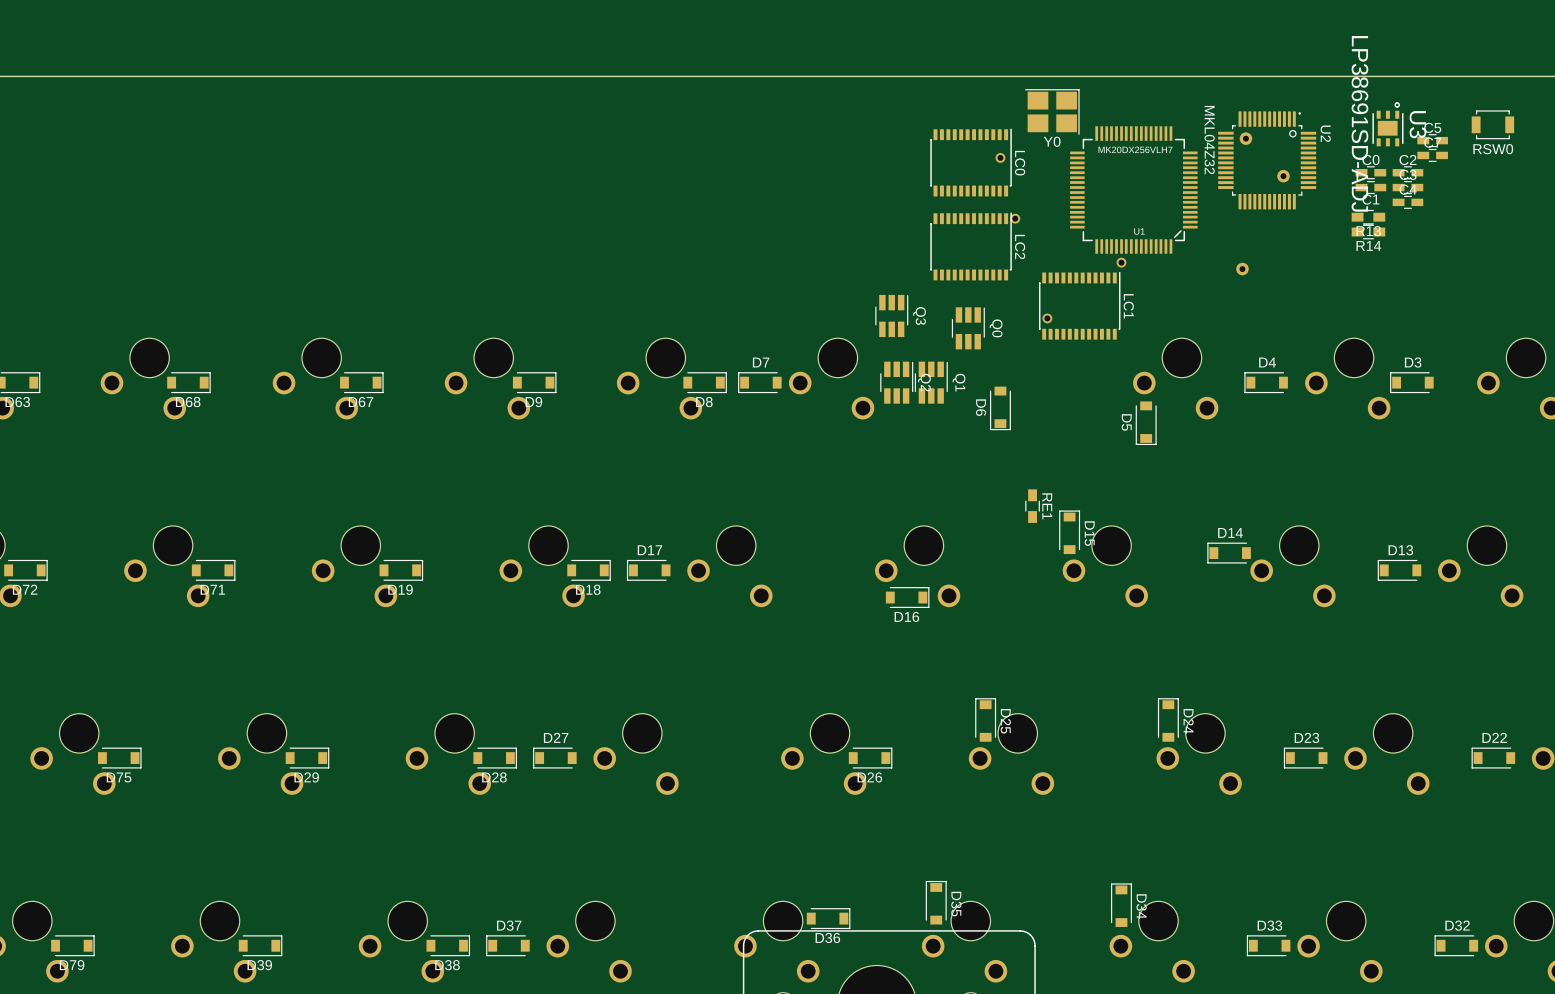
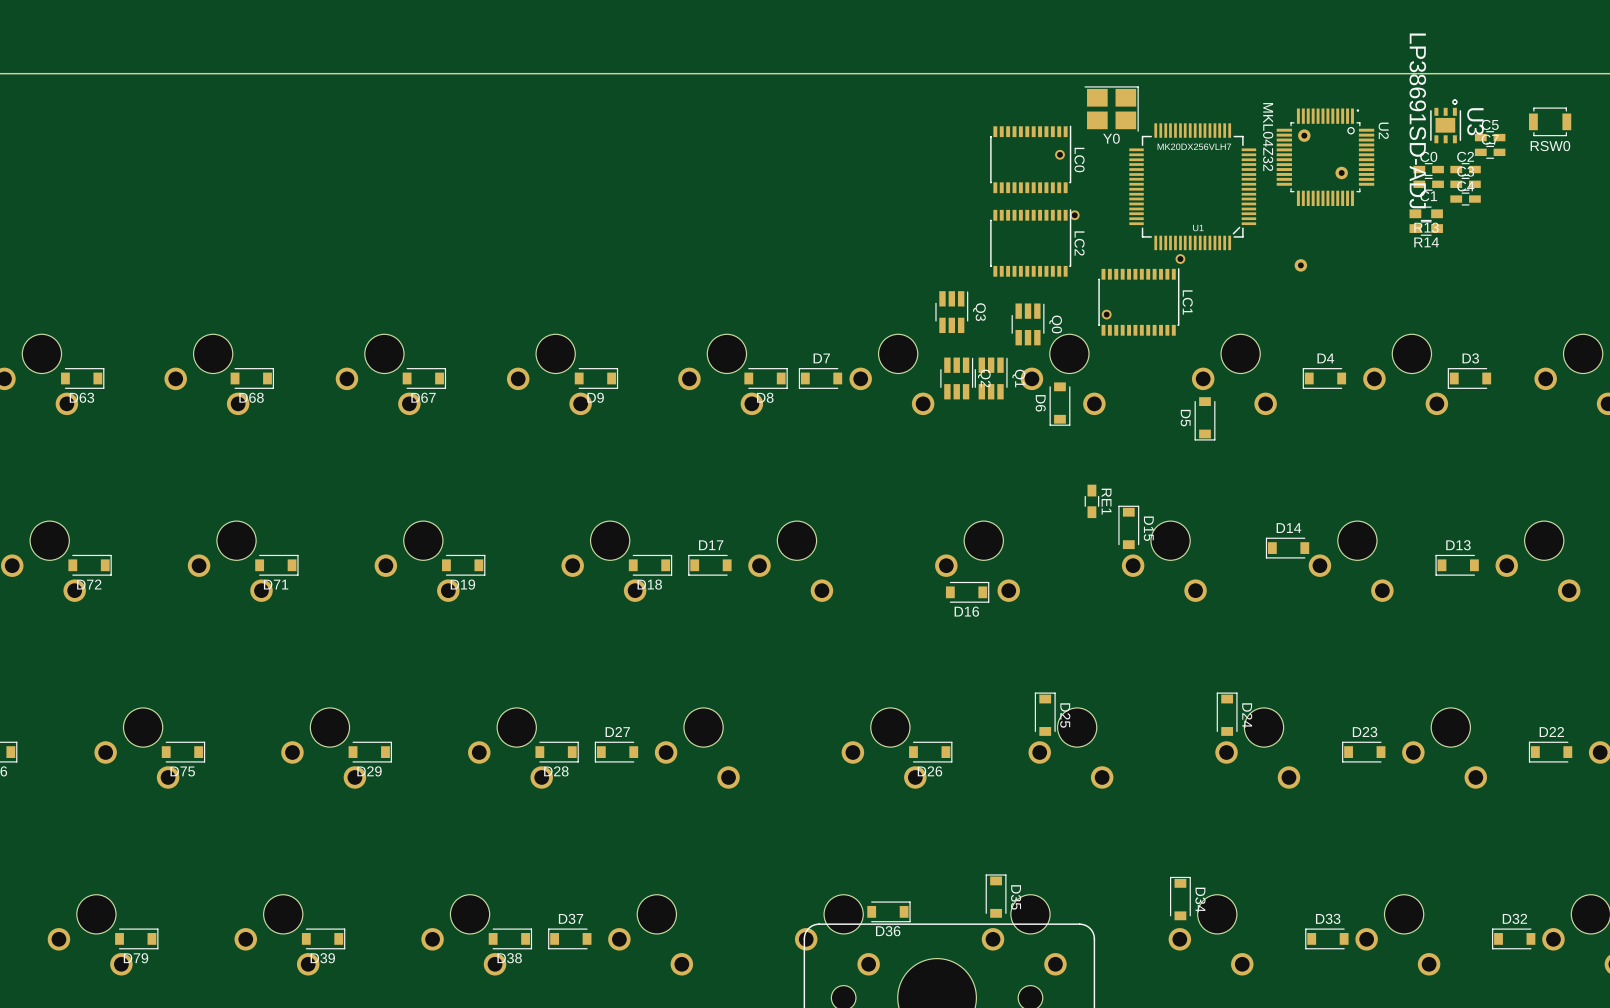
part: none -> (1063, 374)

